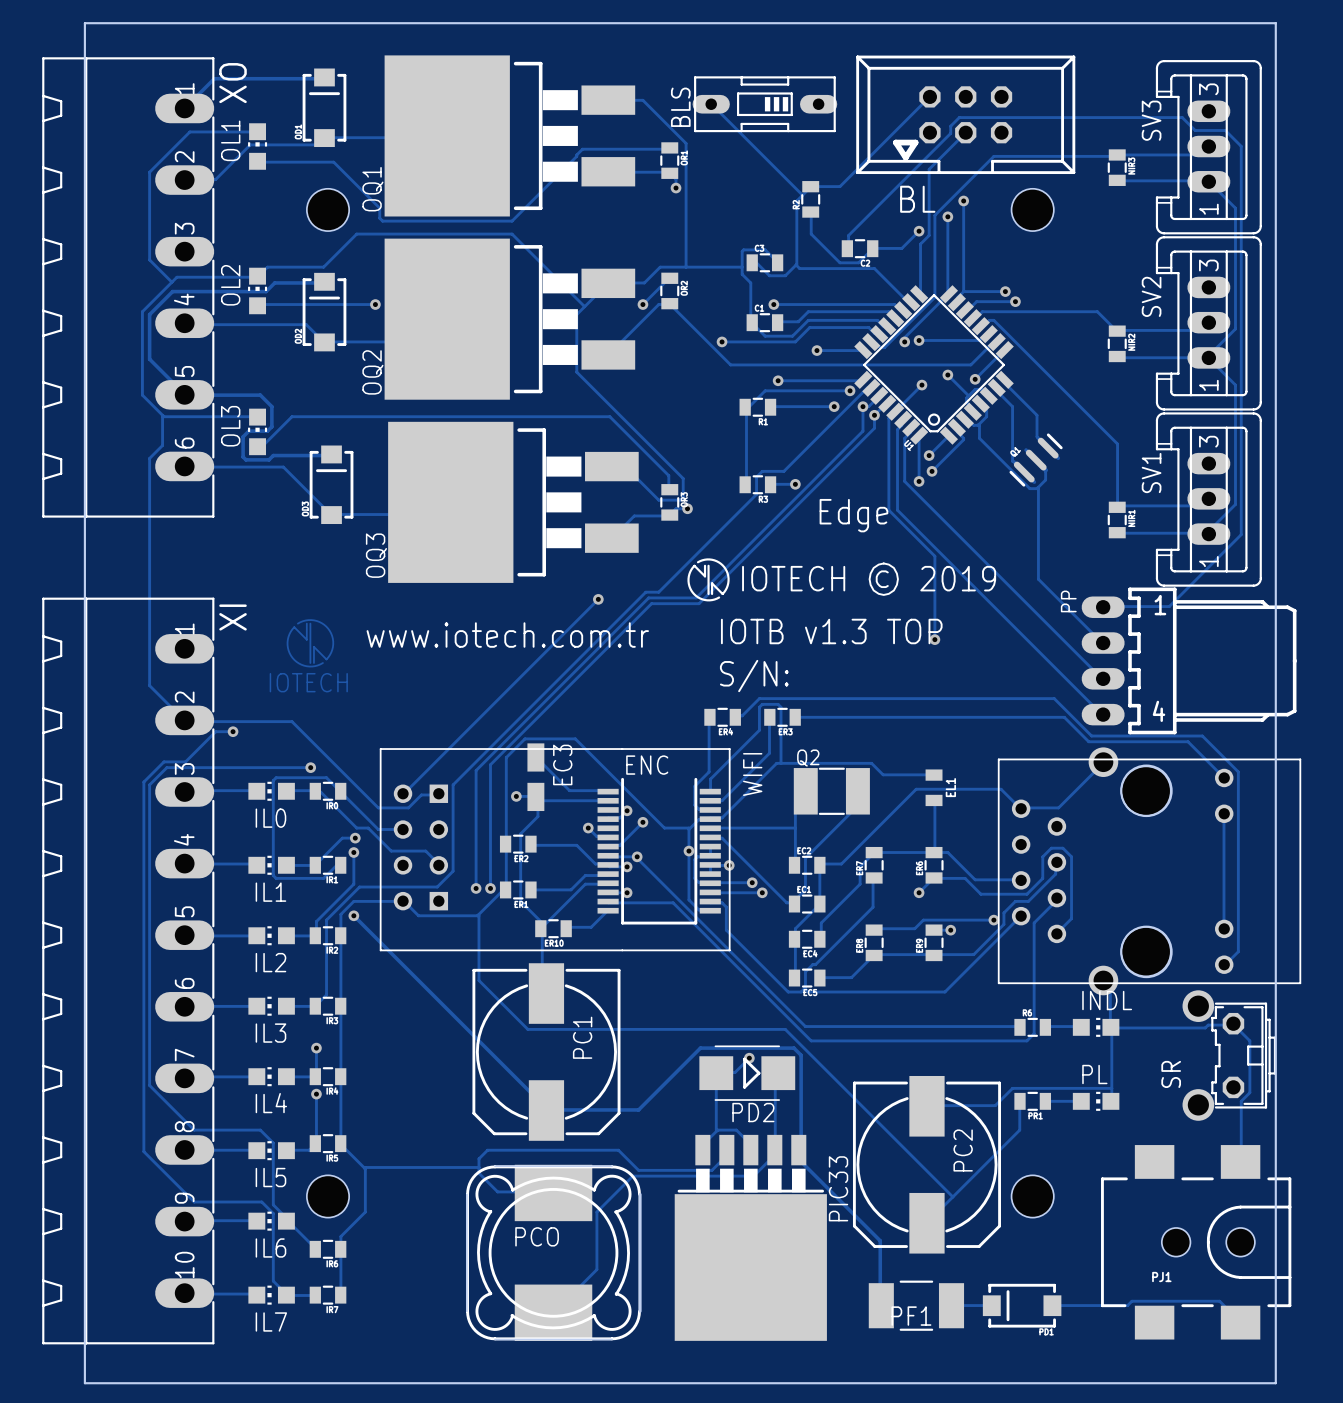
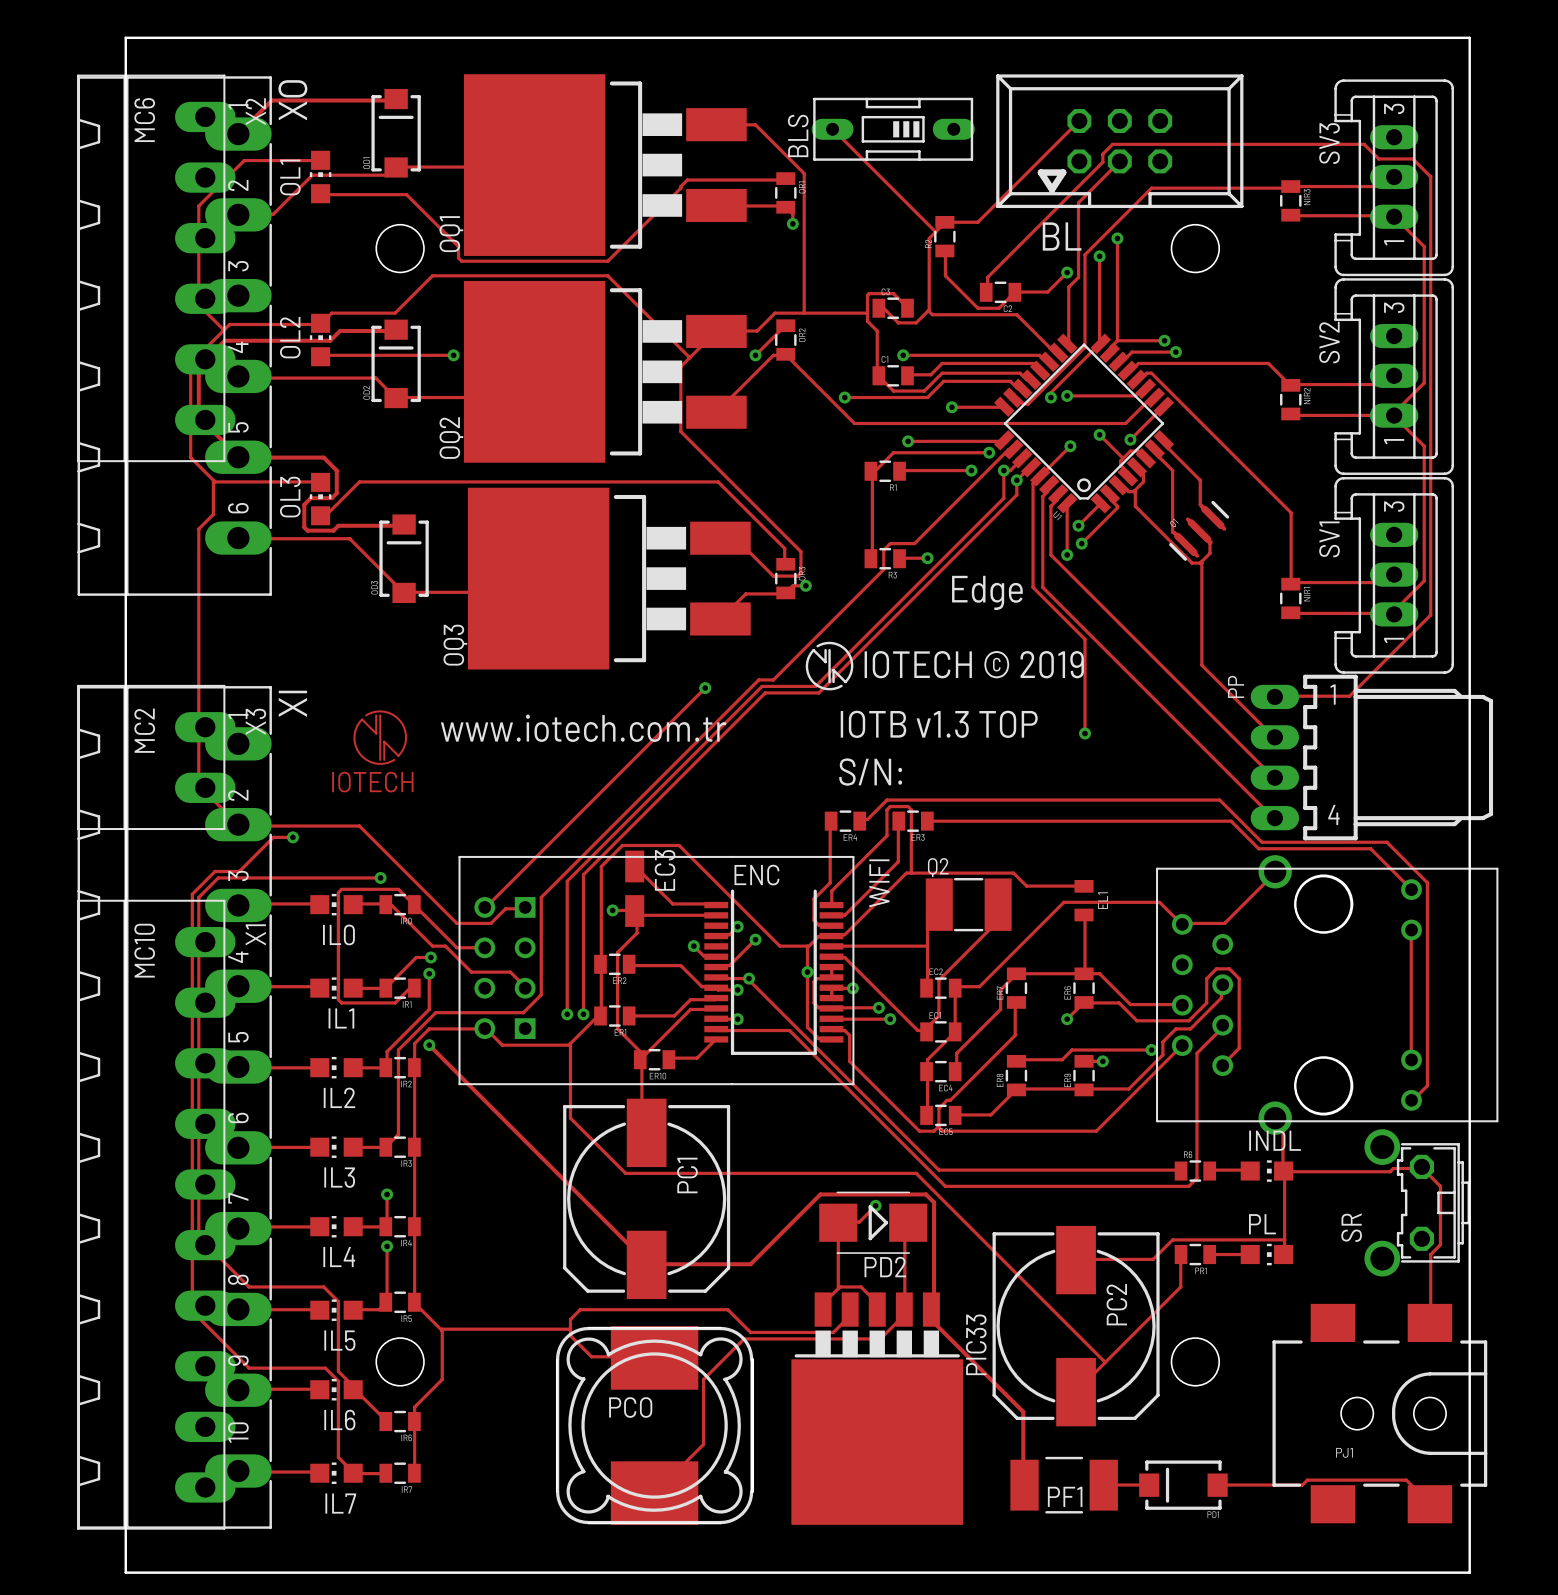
X2: none -> MC6 (156, 268)
X3: none -> MC2 (156, 757)
X1: none -> MC10 (156, 1214)

